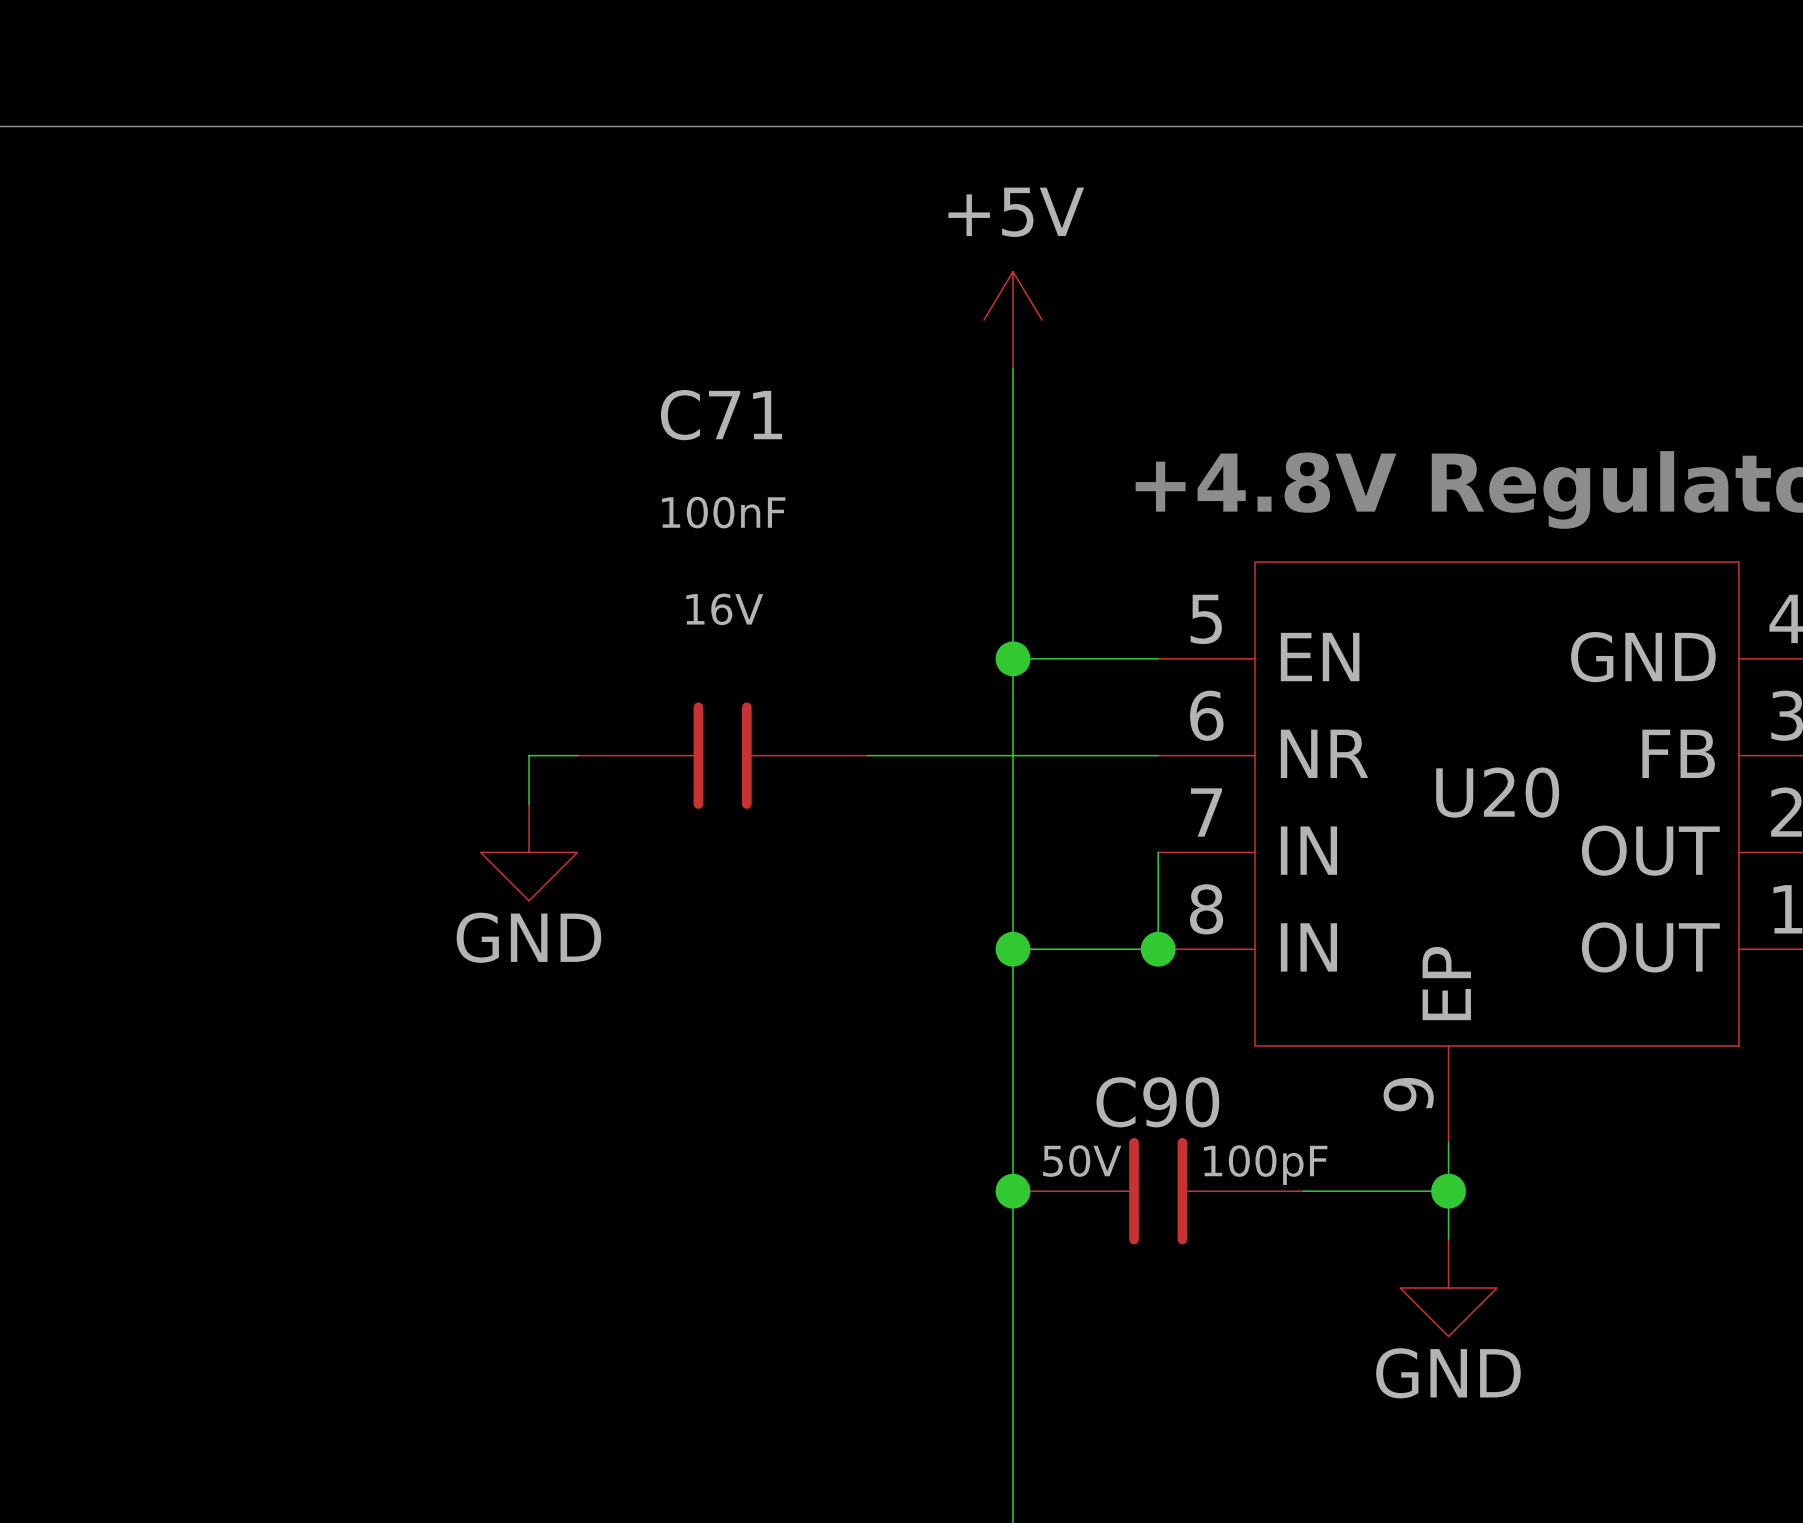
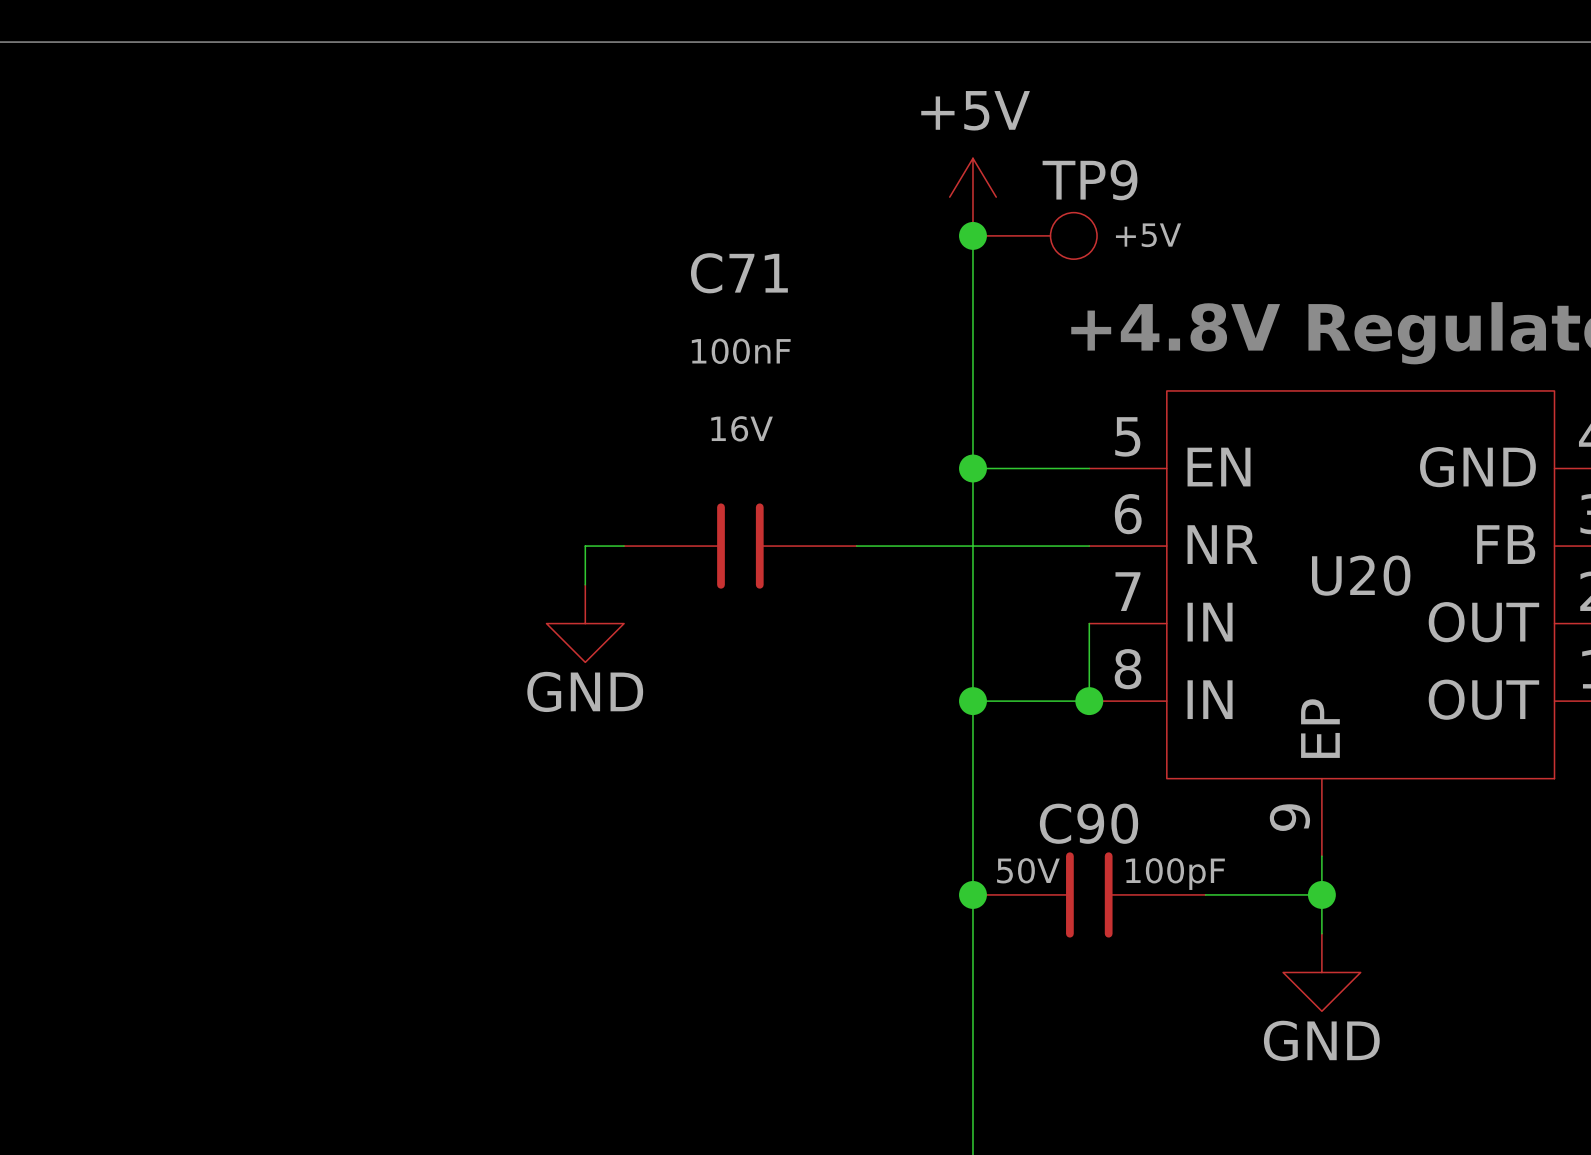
junction: none -> (972, 235)
TP9: none -> +5V (1035, 235)

